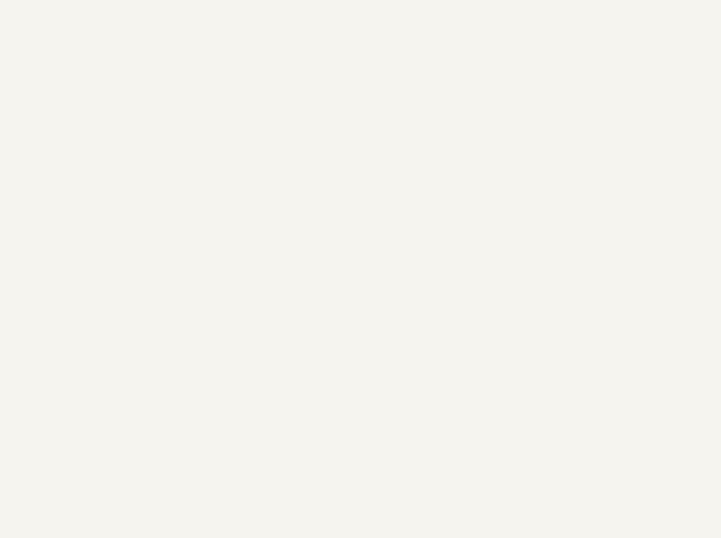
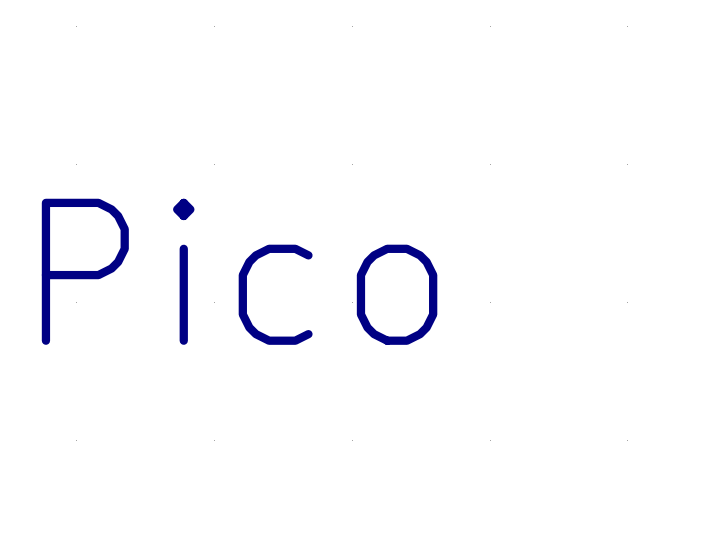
text: none -> Pico (239, 271)

